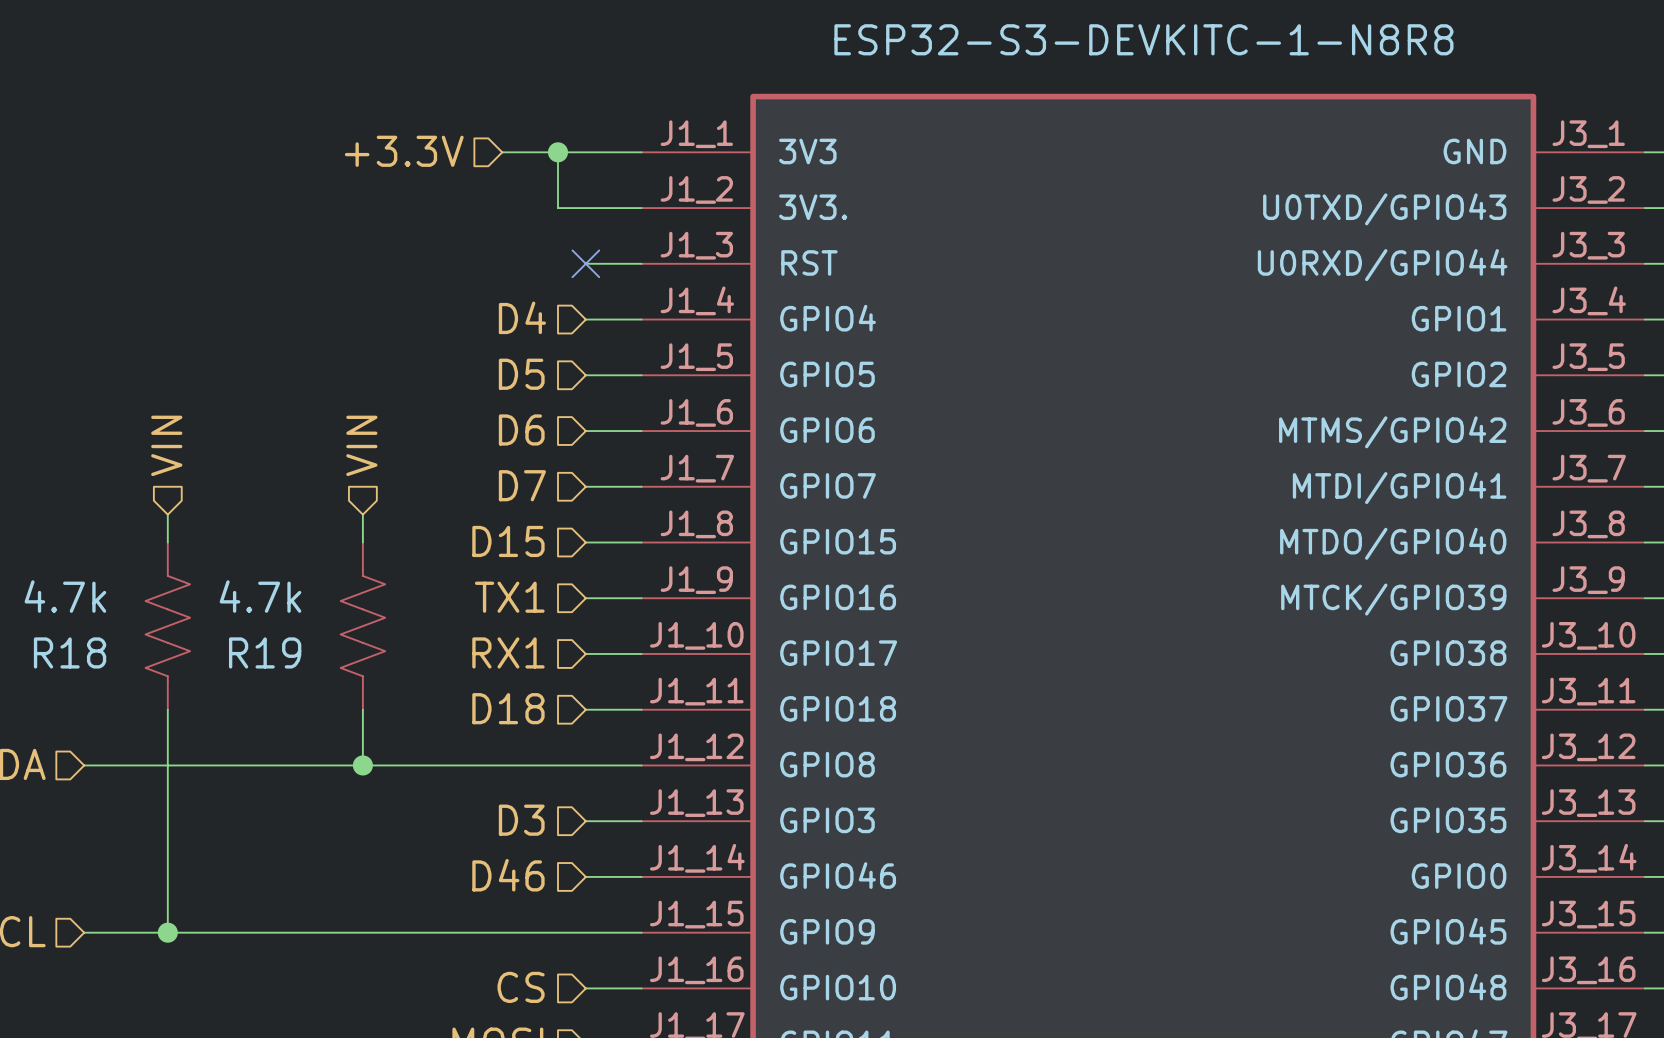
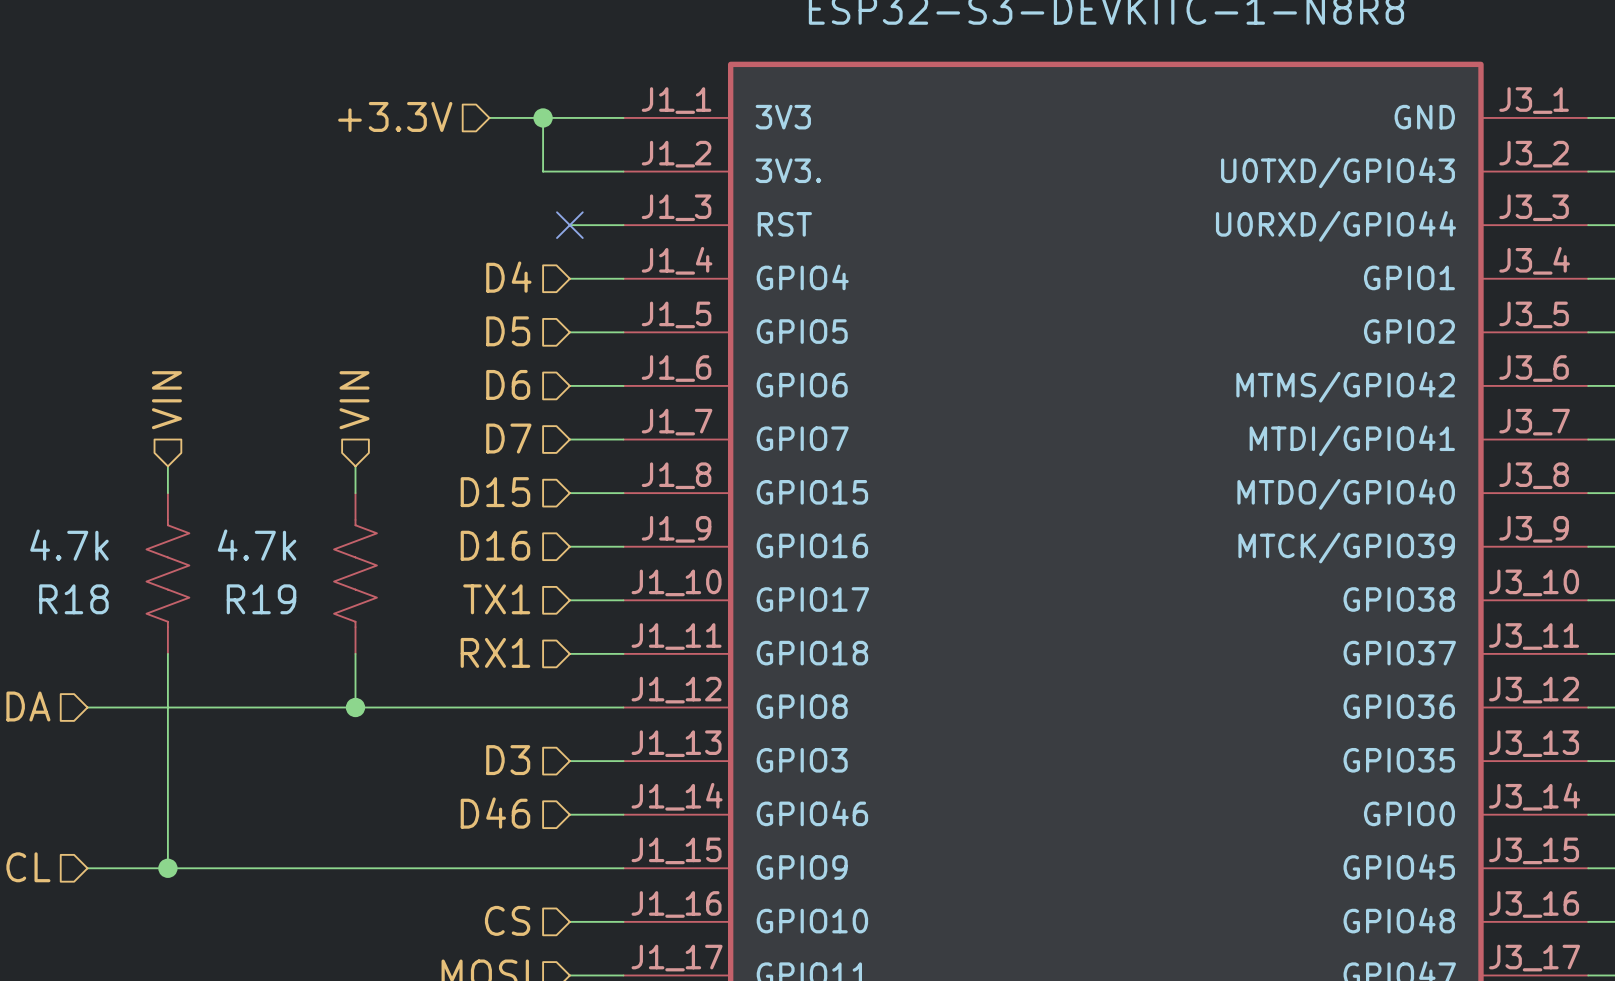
hierarchical label: TX1 (509, 597) -> D16 (495, 545)
hierarchical label: RX1 (508, 652) -> TX1 (496, 599)
hierarchical label: D18 (508, 708) -> RX1 (495, 652)

